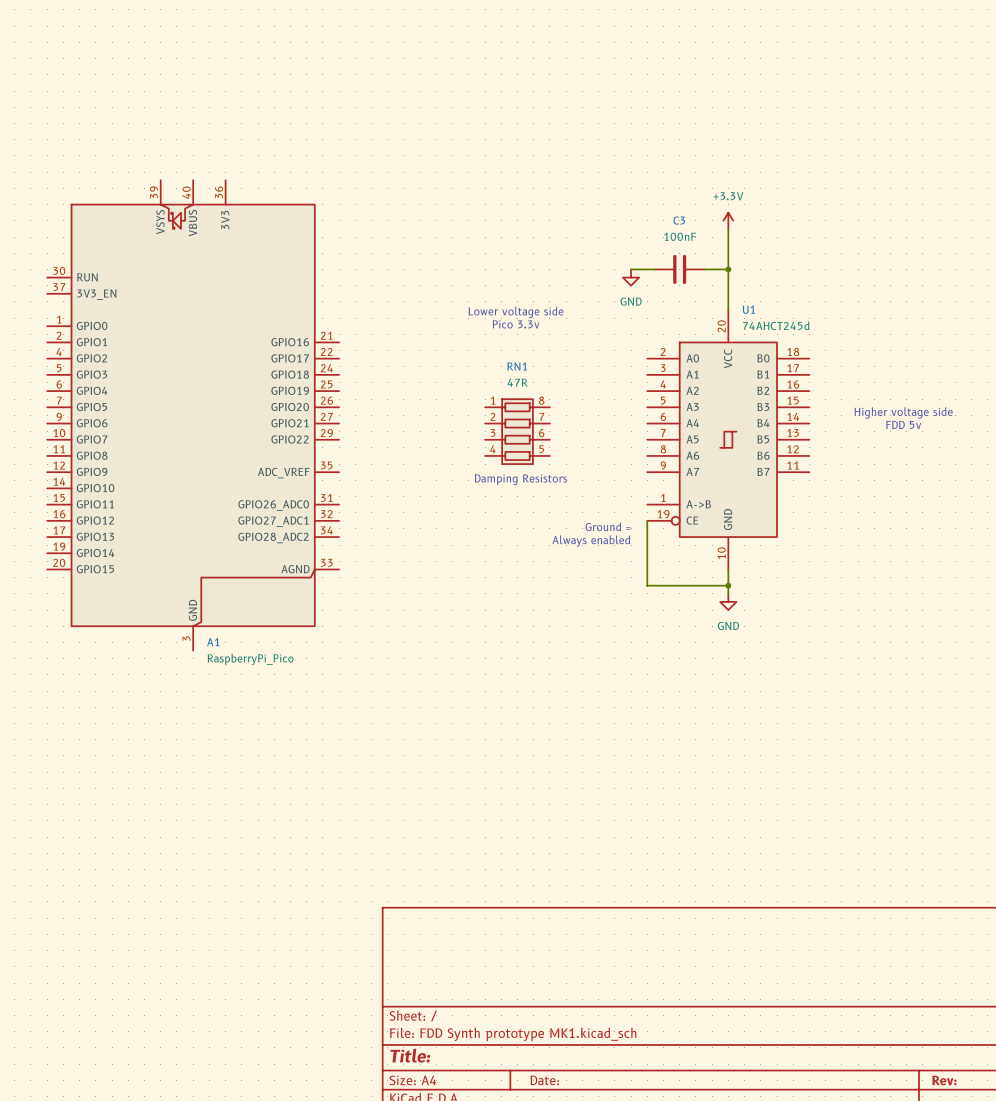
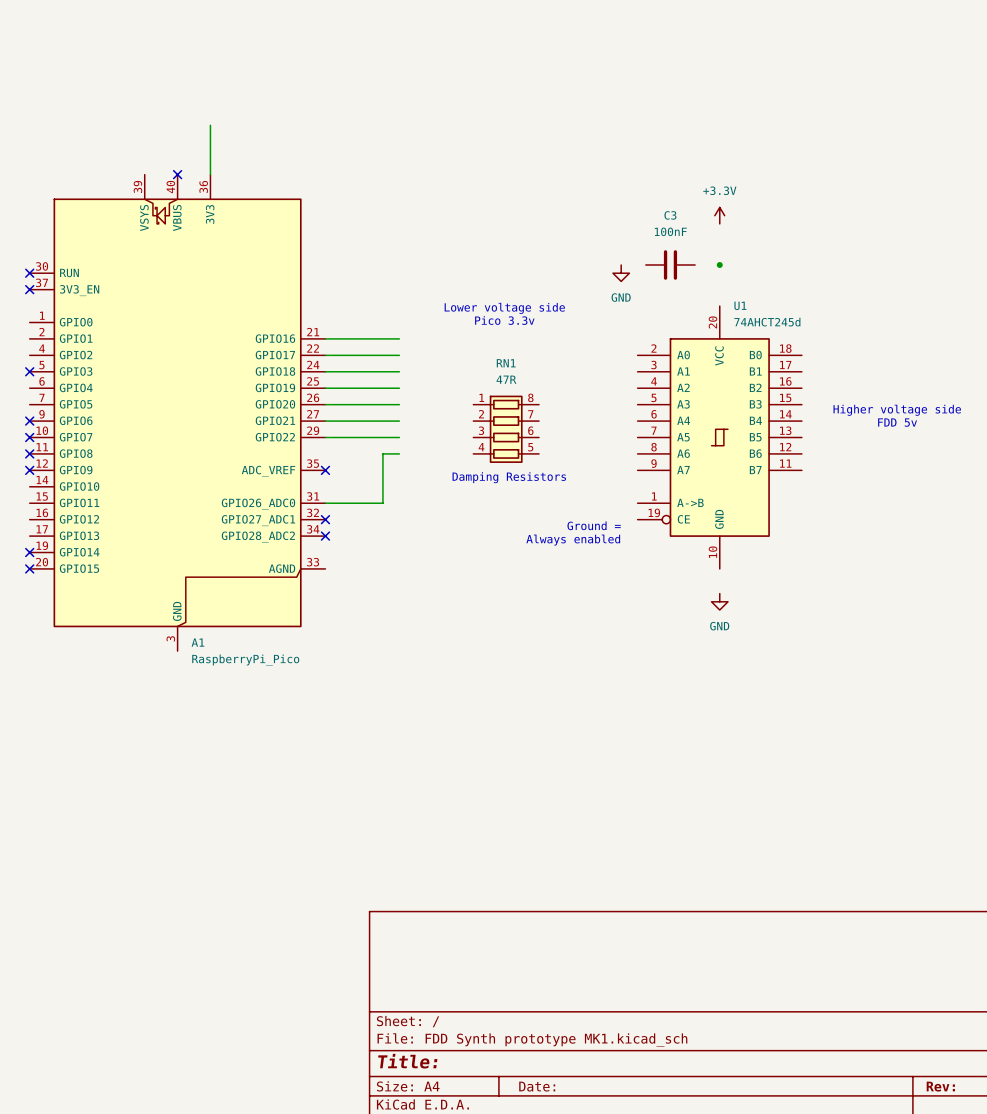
wire: none -> (210, 125) (210, 174)
no-connect mark: none -> (177, 174)
wire: (728, 228) (728, 310) -> none
wire: (631, 269) (655, 269) -> none
wire: (704, 269) (728, 269) -> none
no-connect mark: none -> (29, 273)
no-connect mark: none -> (29, 289)
wire: none -> (325, 338) (399, 338)
wire: none -> (325, 355) (399, 355)
no-connect mark: none -> (29, 371)
wire: none -> (325, 371) (399, 371)
wire: none -> (325, 388) (399, 388)
wire: none -> (325, 404) (399, 404)
no-connect mark: none -> (29, 421)
wire: none -> (325, 421) (399, 421)
no-connect mark: none -> (29, 437)
wire: none -> (325, 437) (399, 437)
no-connect mark: none -> (29, 453)
wire: none -> (399, 453) (382, 453) (382, 503) (325, 503)
no-connect mark: none -> (29, 470)
no-connect mark: none -> (325, 470)
no-connect mark: none -> (325, 519)
wire: (647, 520) (647, 585) (728, 585) -> none
no-connect mark: none -> (325, 536)
no-connect mark: none -> (29, 552)
no-connect mark: none -> (29, 568)
wire: (728, 569) (728, 593) -> none
junction: (728, 585) -> none

